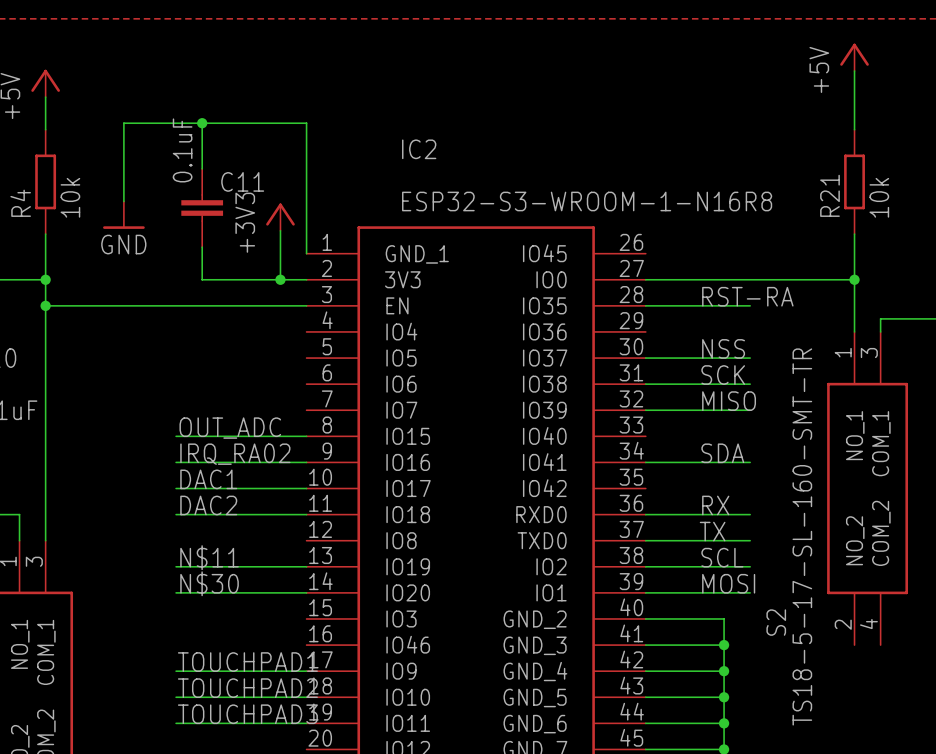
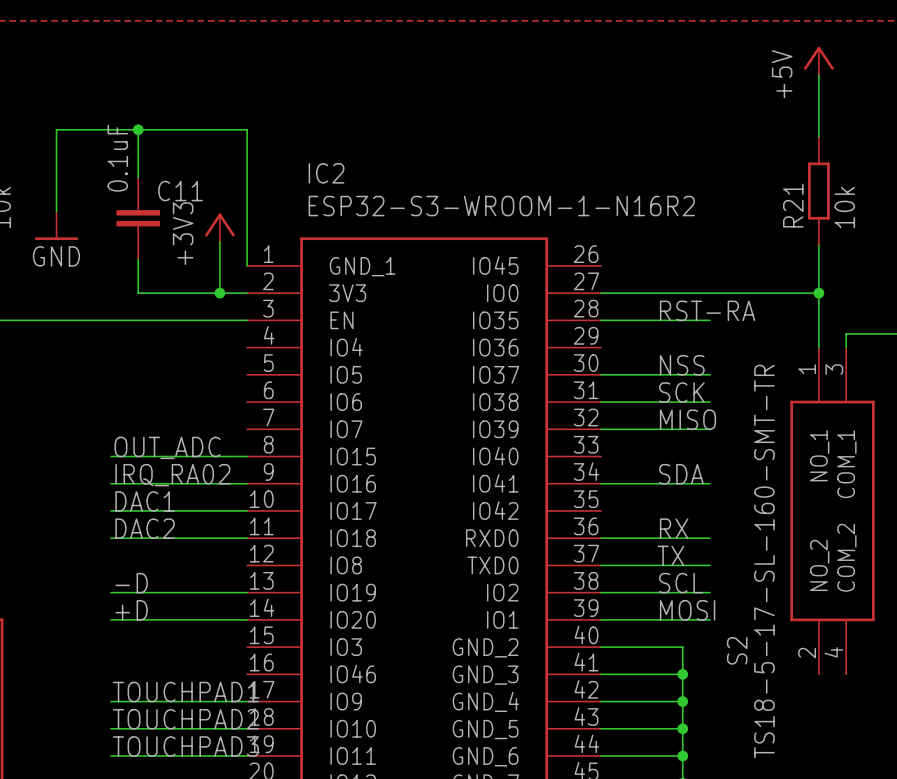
IC2 name position: IC2 (419, 149) -> IC2 (326, 173)
IC2 value: ESP32-S3-WROOM-1-N16R8 (587, 201) -> ESP32-S3-WROOM-1-N16R2 (501, 206)
label: N$11 (209, 557) -> -D (131, 583)
label: N$30 (209, 583) -> +D (131, 610)

